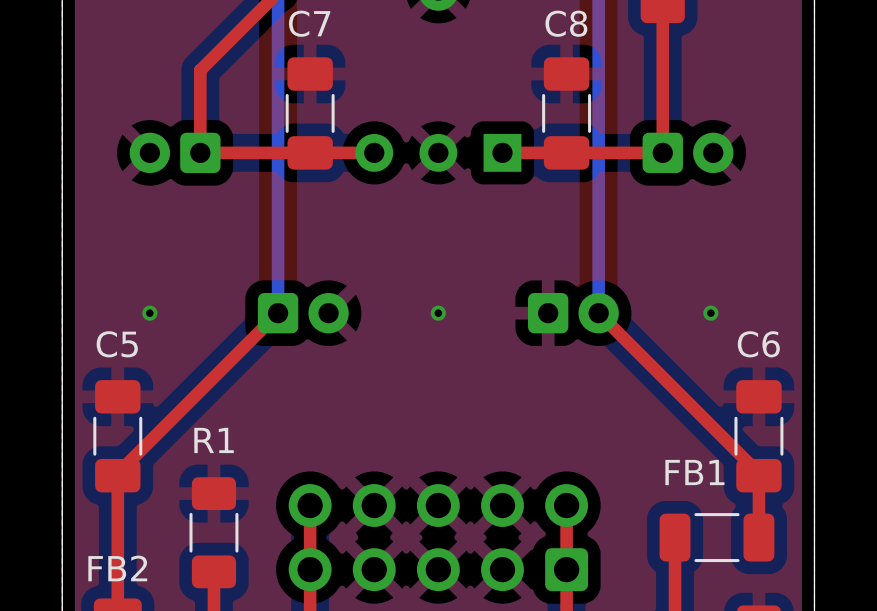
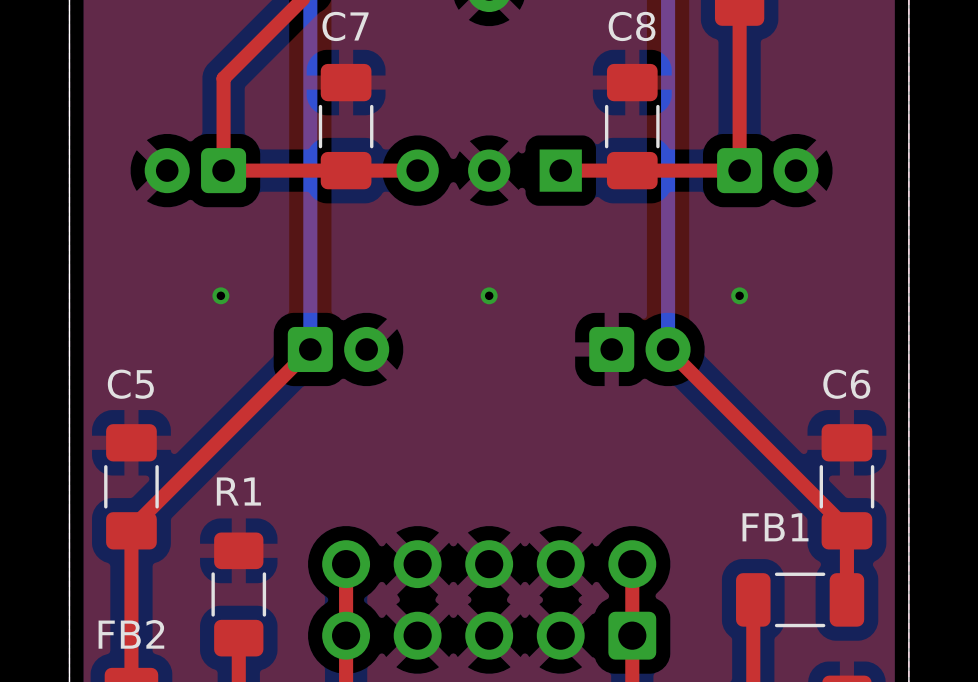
via position: (149, 313) -> (220, 295)
via position: (438, 313) -> (489, 295)
via position: (710, 313) -> (739, 295)

